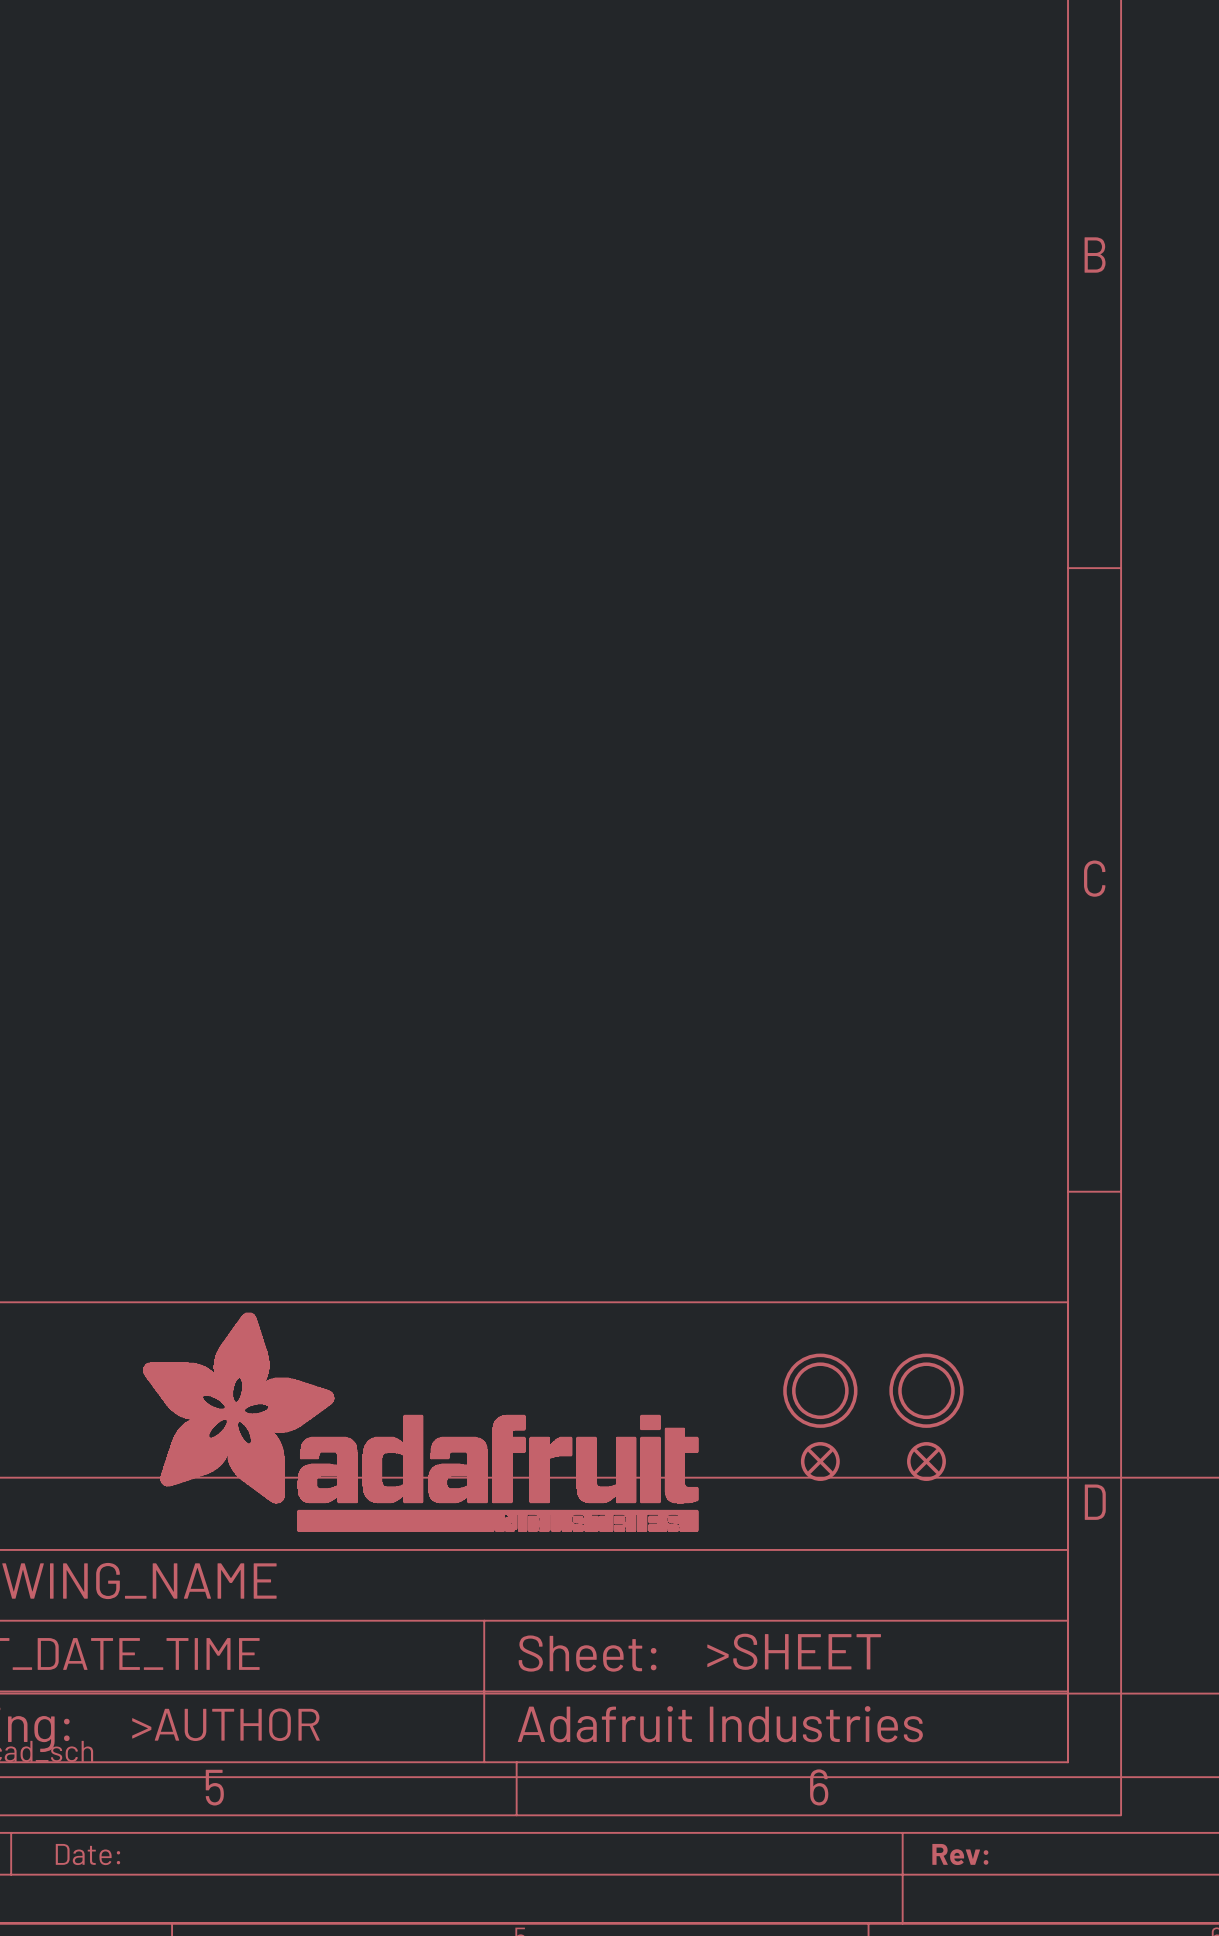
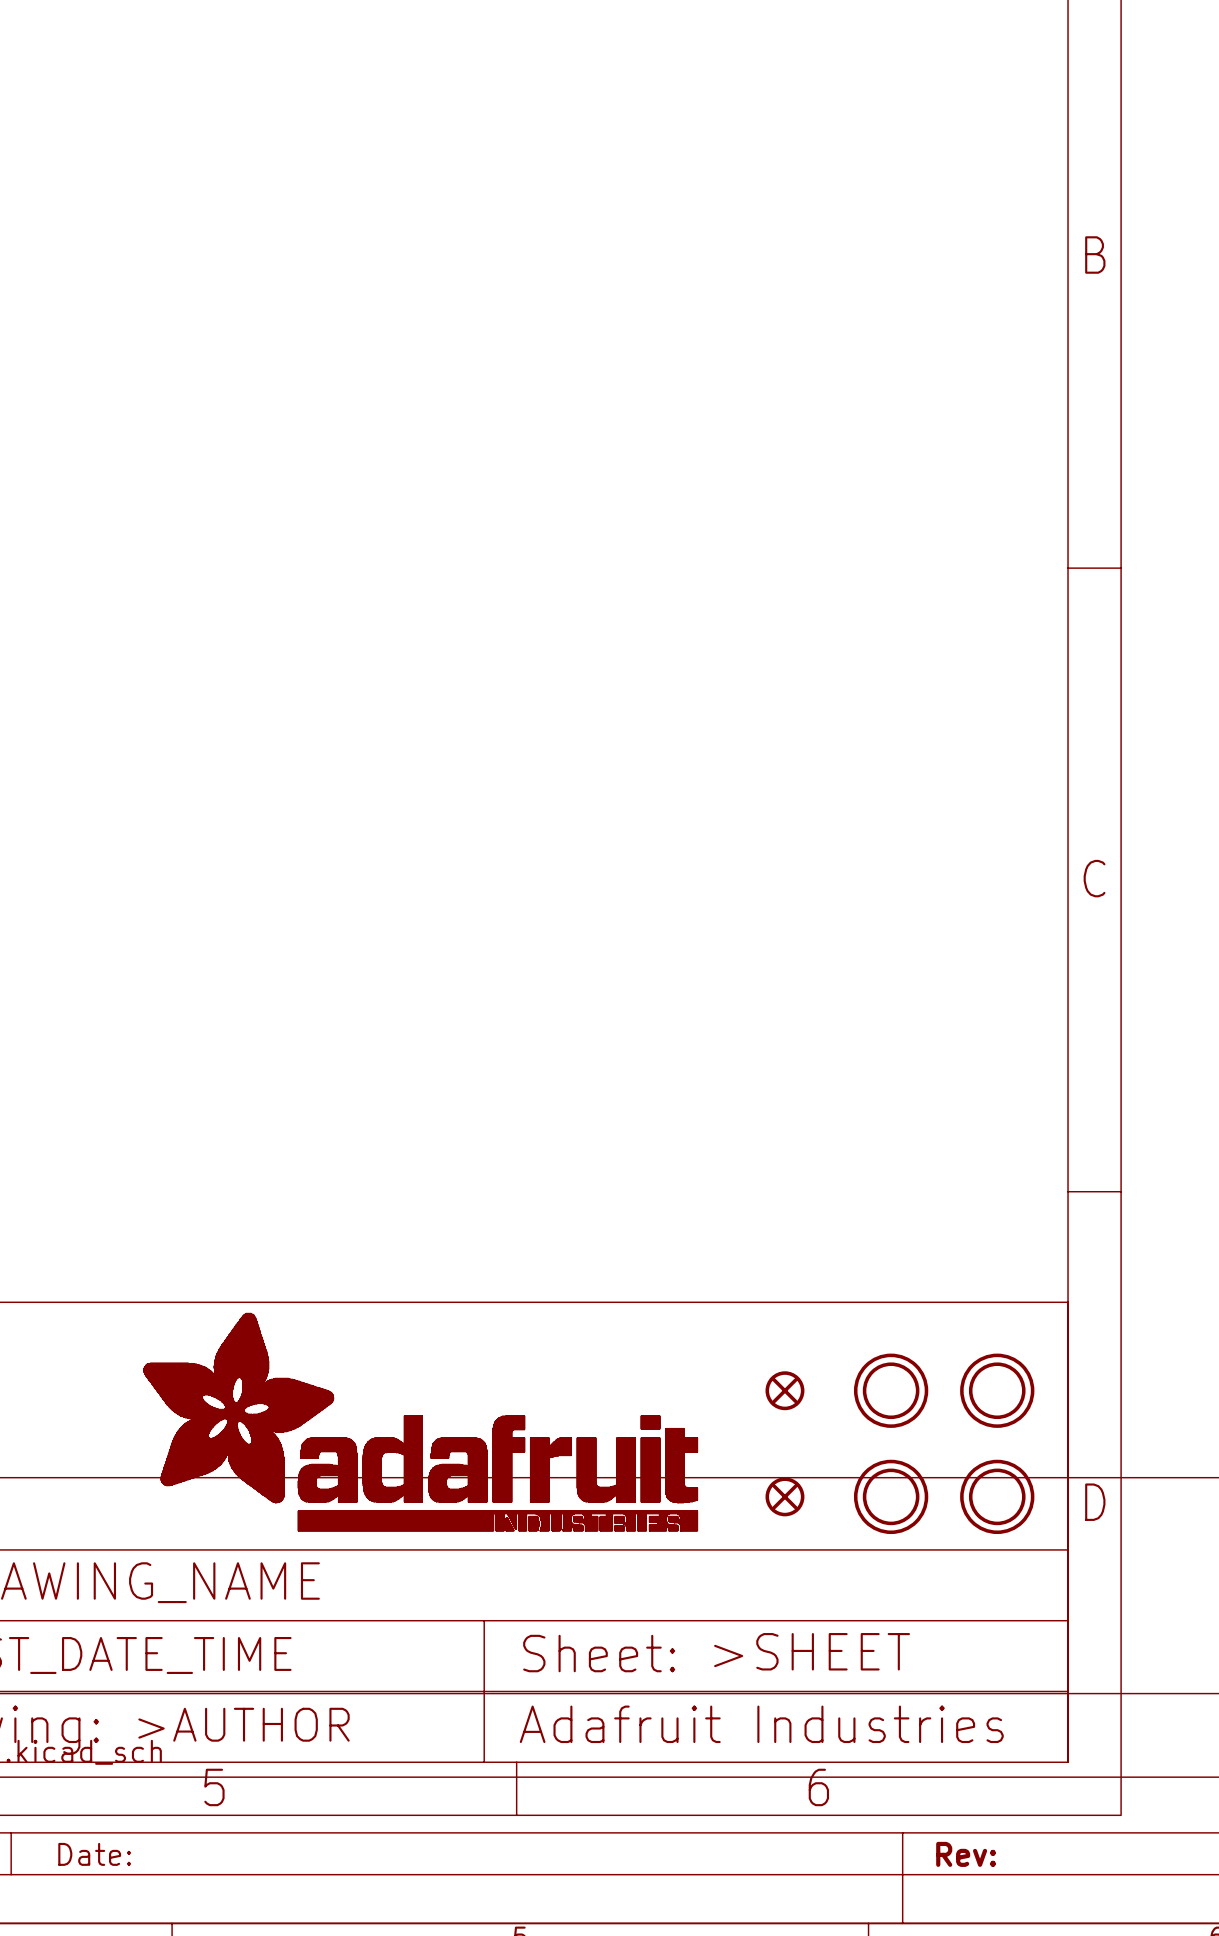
part: none -> (784, 1390)
part: (820, 1390) -> none
part: none -> (891, 1390)
part: (926, 1390) -> none
part: none -> (997, 1390)
part: (820, 1461) -> none
part: (926, 1461) -> none
part: none -> (784, 1496)
part: none -> (891, 1496)
part: none -> (997, 1496)

